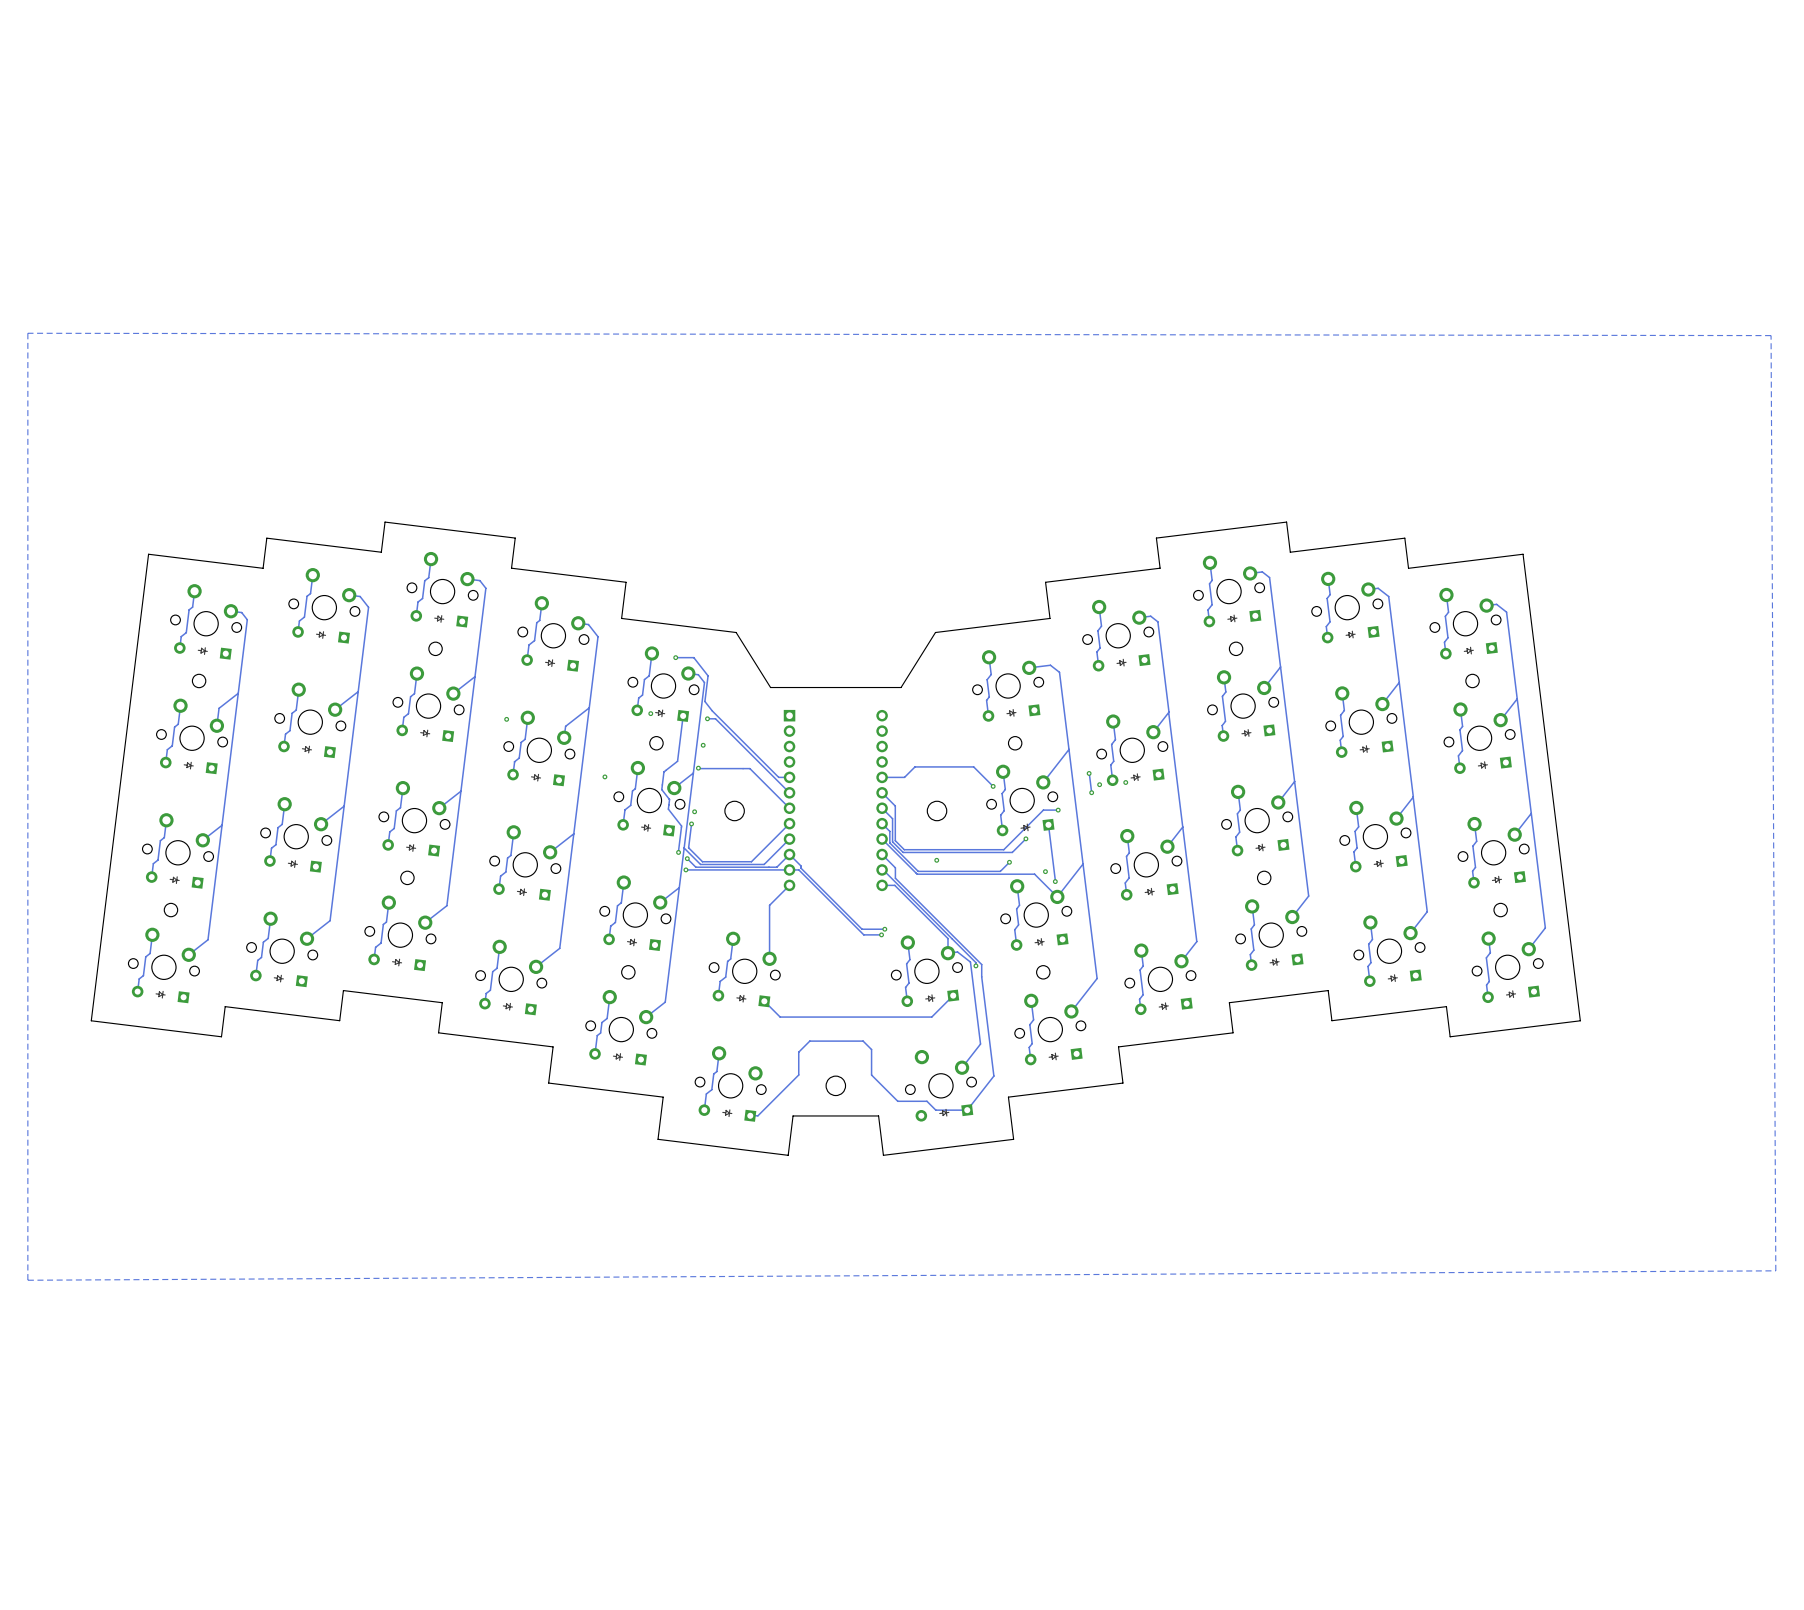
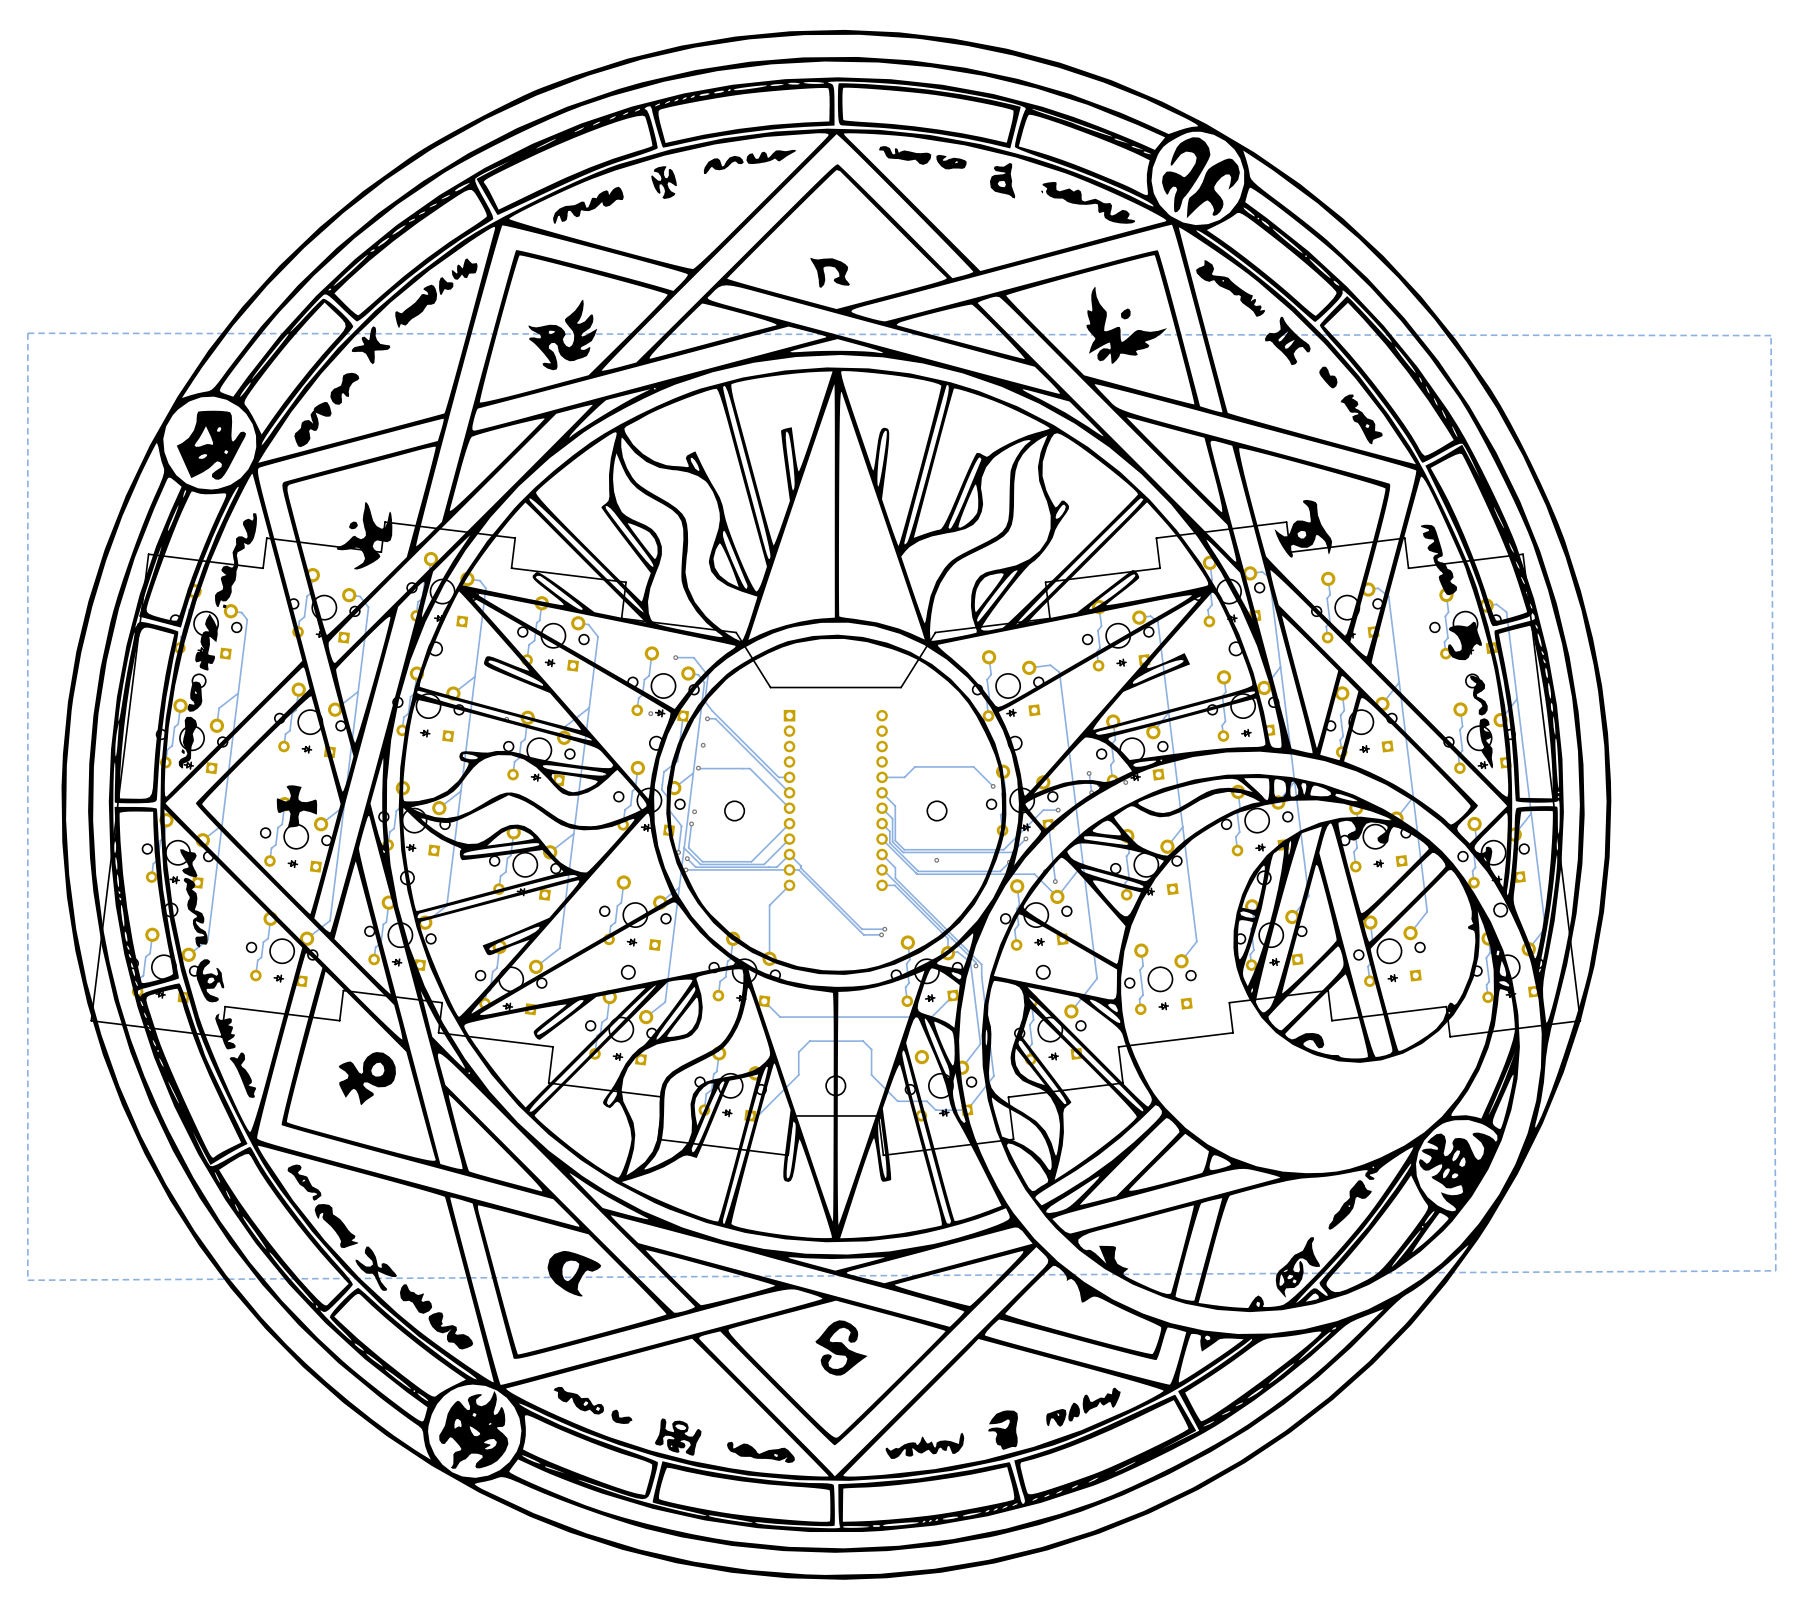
drawing: none -> [61, 29, 1612, 1580]

